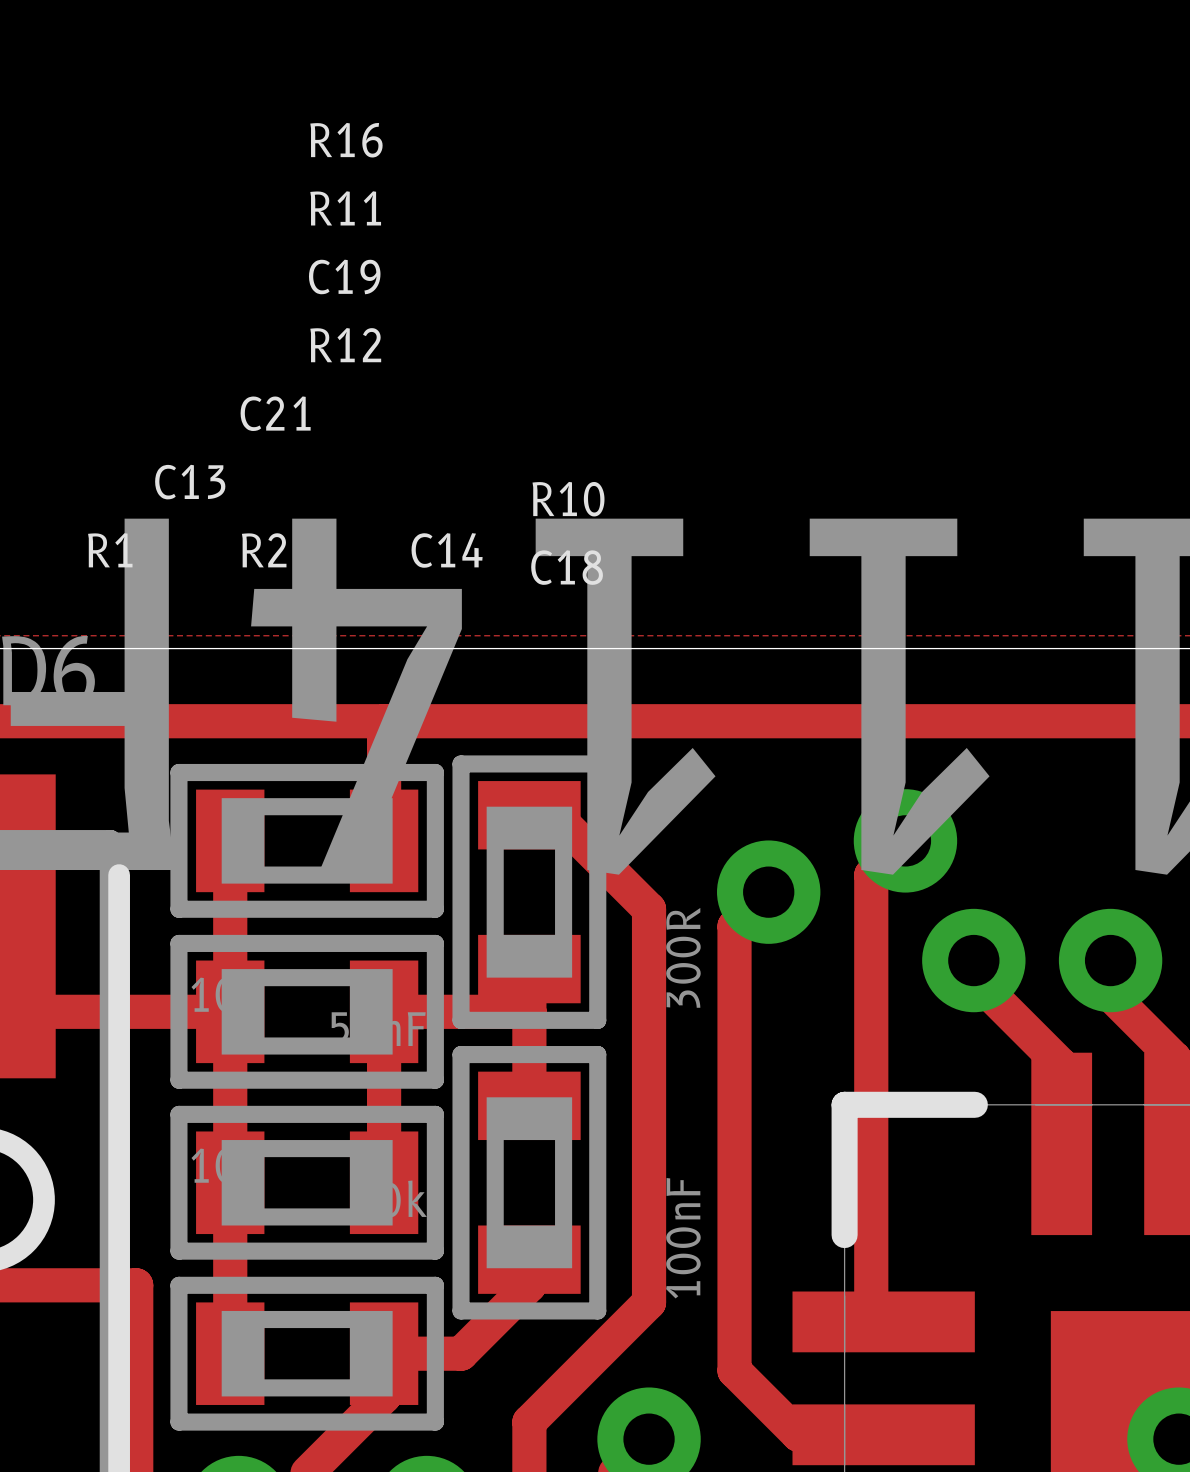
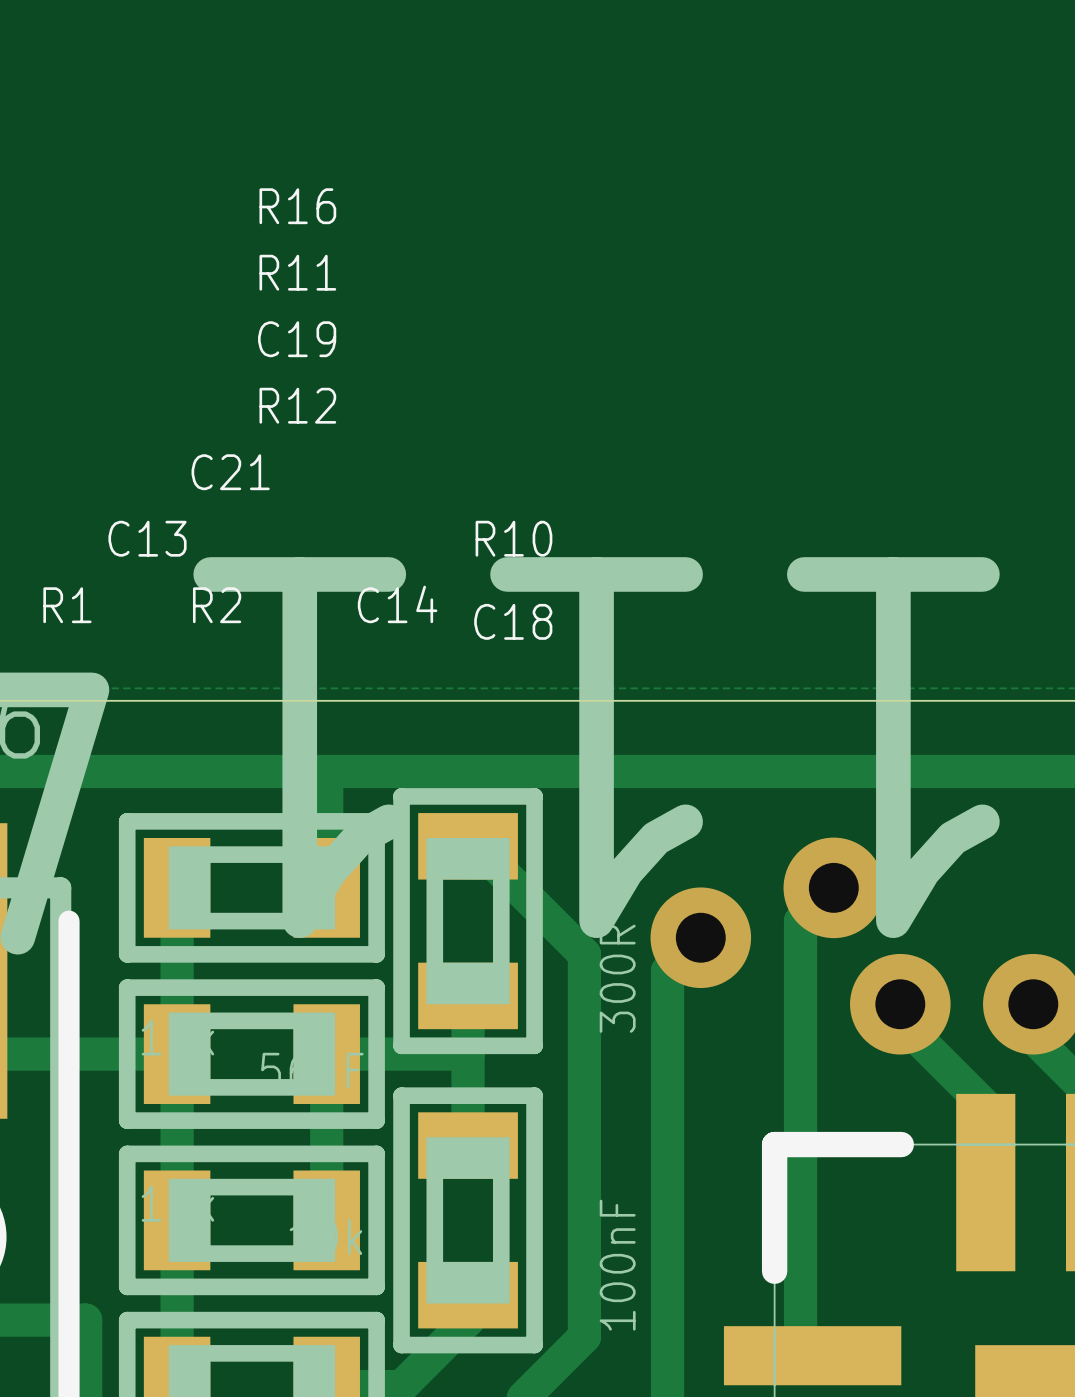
R10 position: (529, 892) -> (468, 921)

